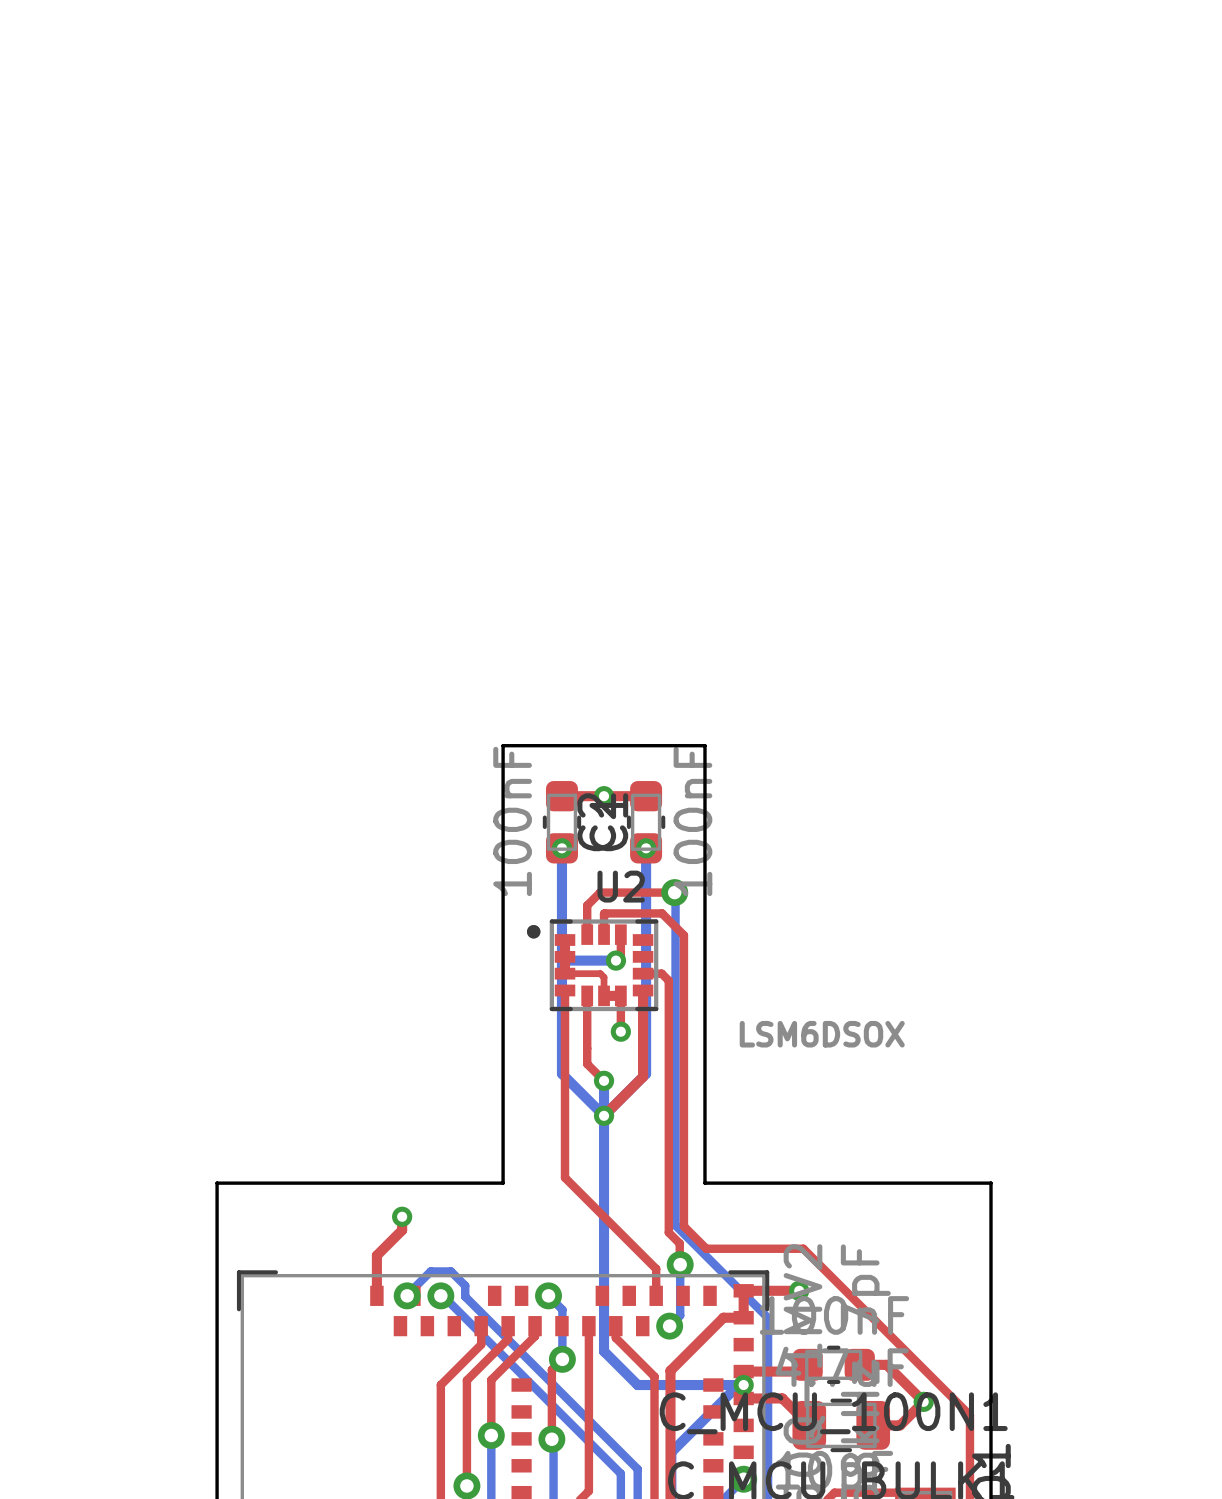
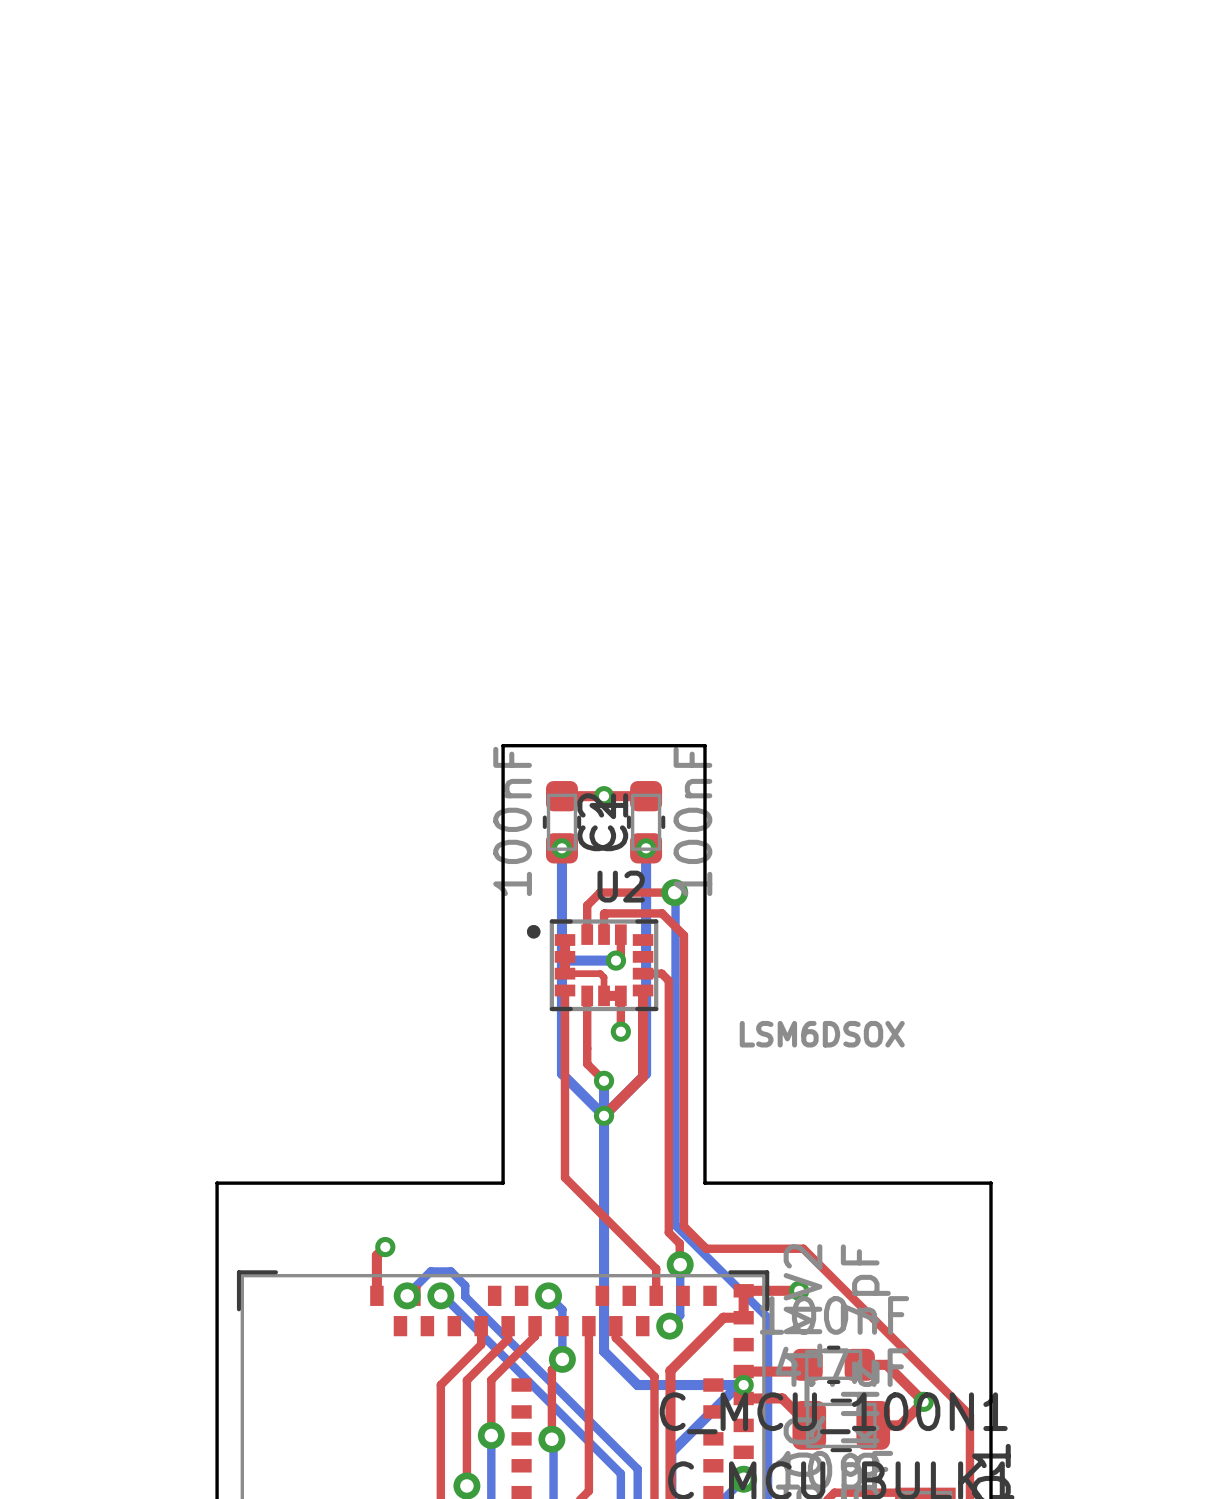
top track: (402, 1216) (402, 1230) (385, 1247) -> none
via position: (402, 1216) -> (385, 1247)

